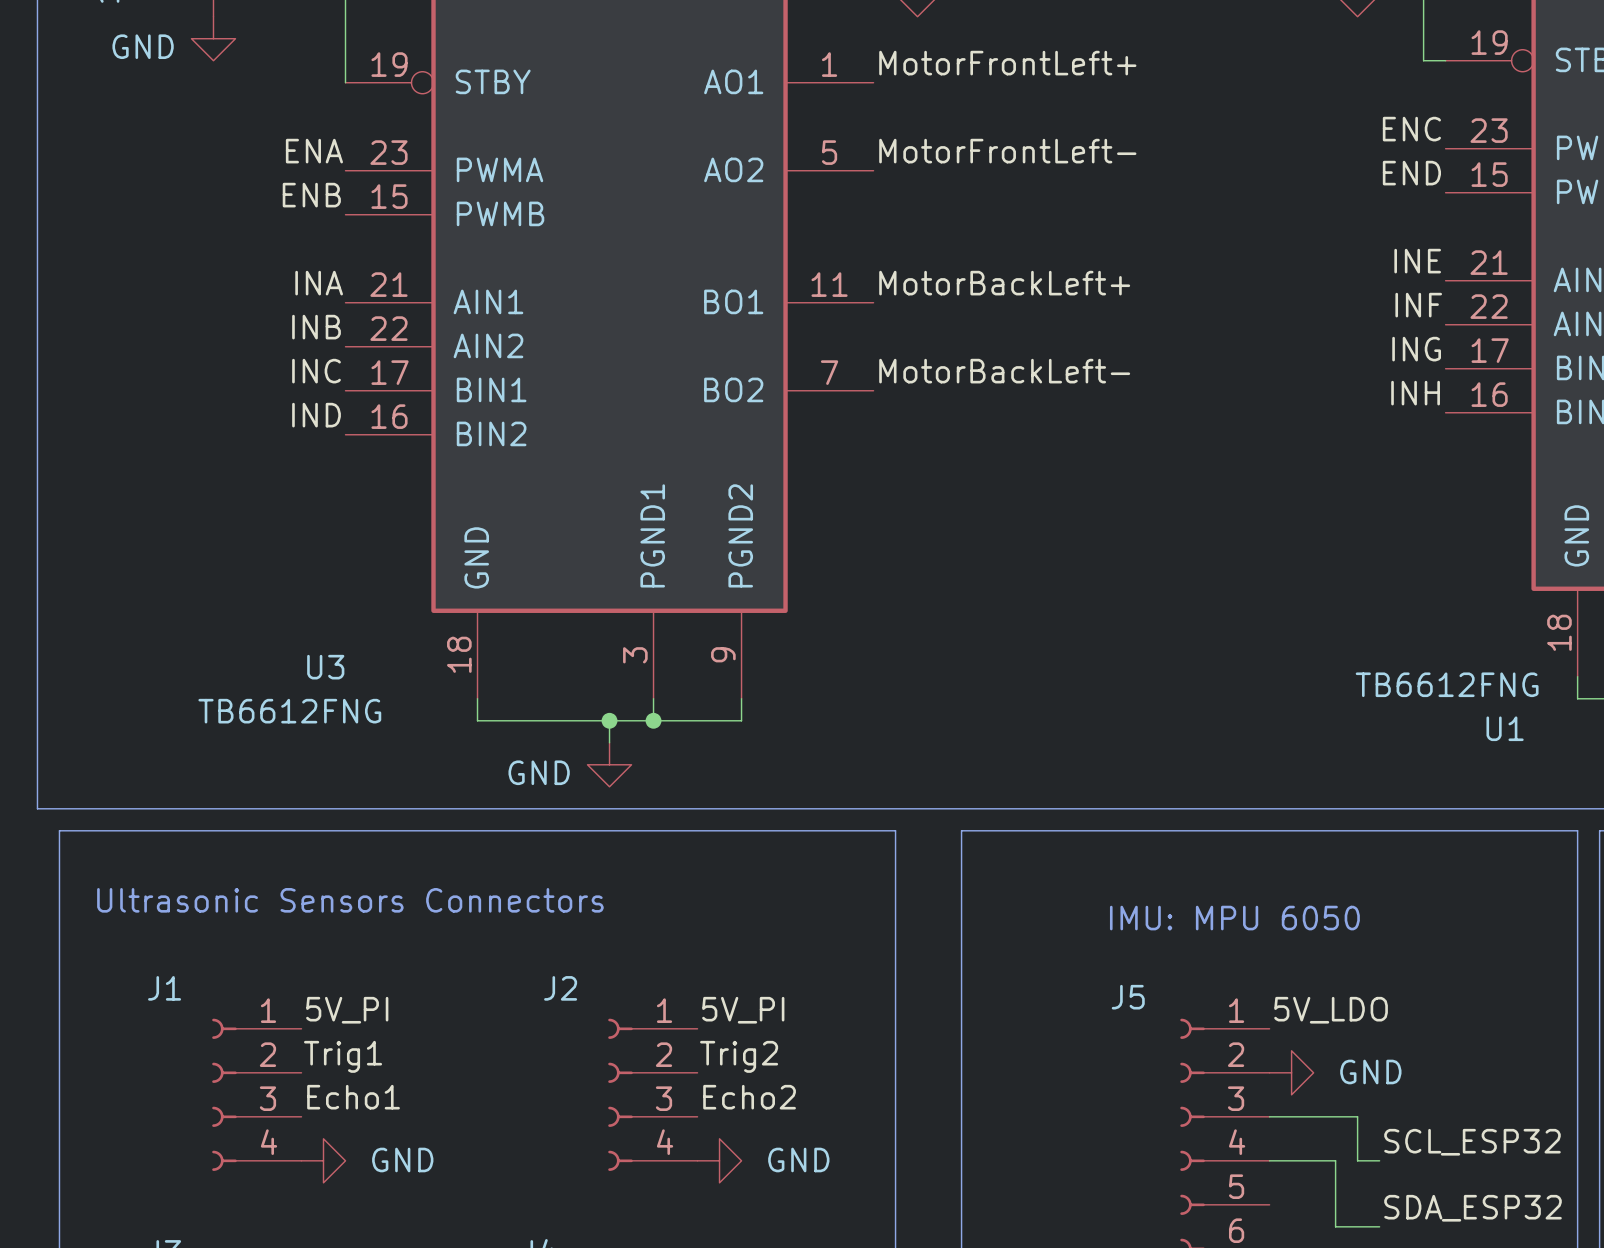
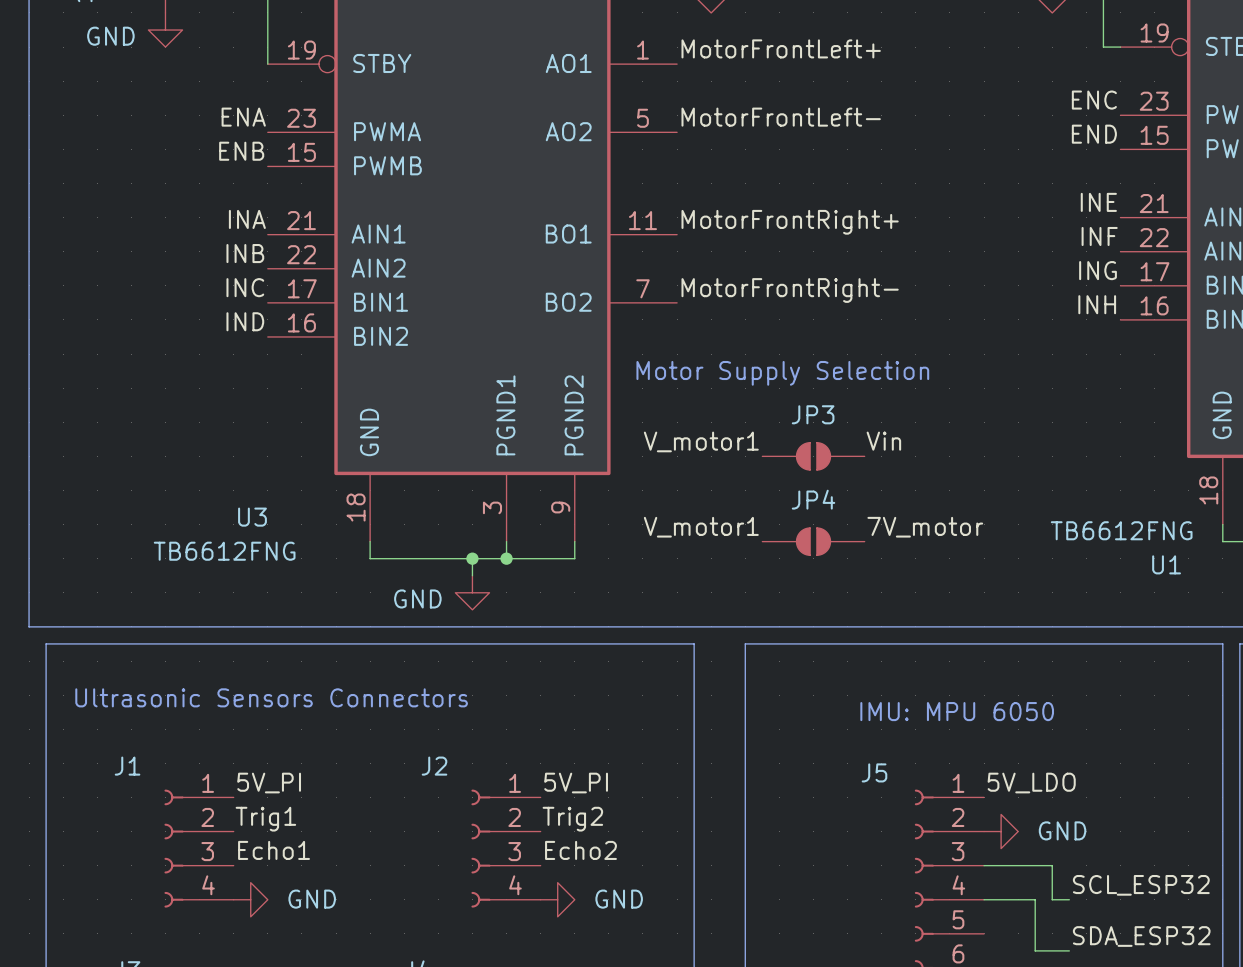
label: MotorBackLeft+ (1004, 283) -> MotorFrontRight+ (790, 222)
label: MotorBackLeft- (1004, 371) -> MotorFrontRight- (790, 290)
text: none -> Motor Supply Selection (782, 373)
label: none -> Vin (883, 441)
label: none -> V_motor1 (701, 441)
JP3: none -> (813, 456)
label: none -> V_motor1 (701, 527)
label: none -> 7V_motor (925, 527)
JP4: none -> (813, 541)

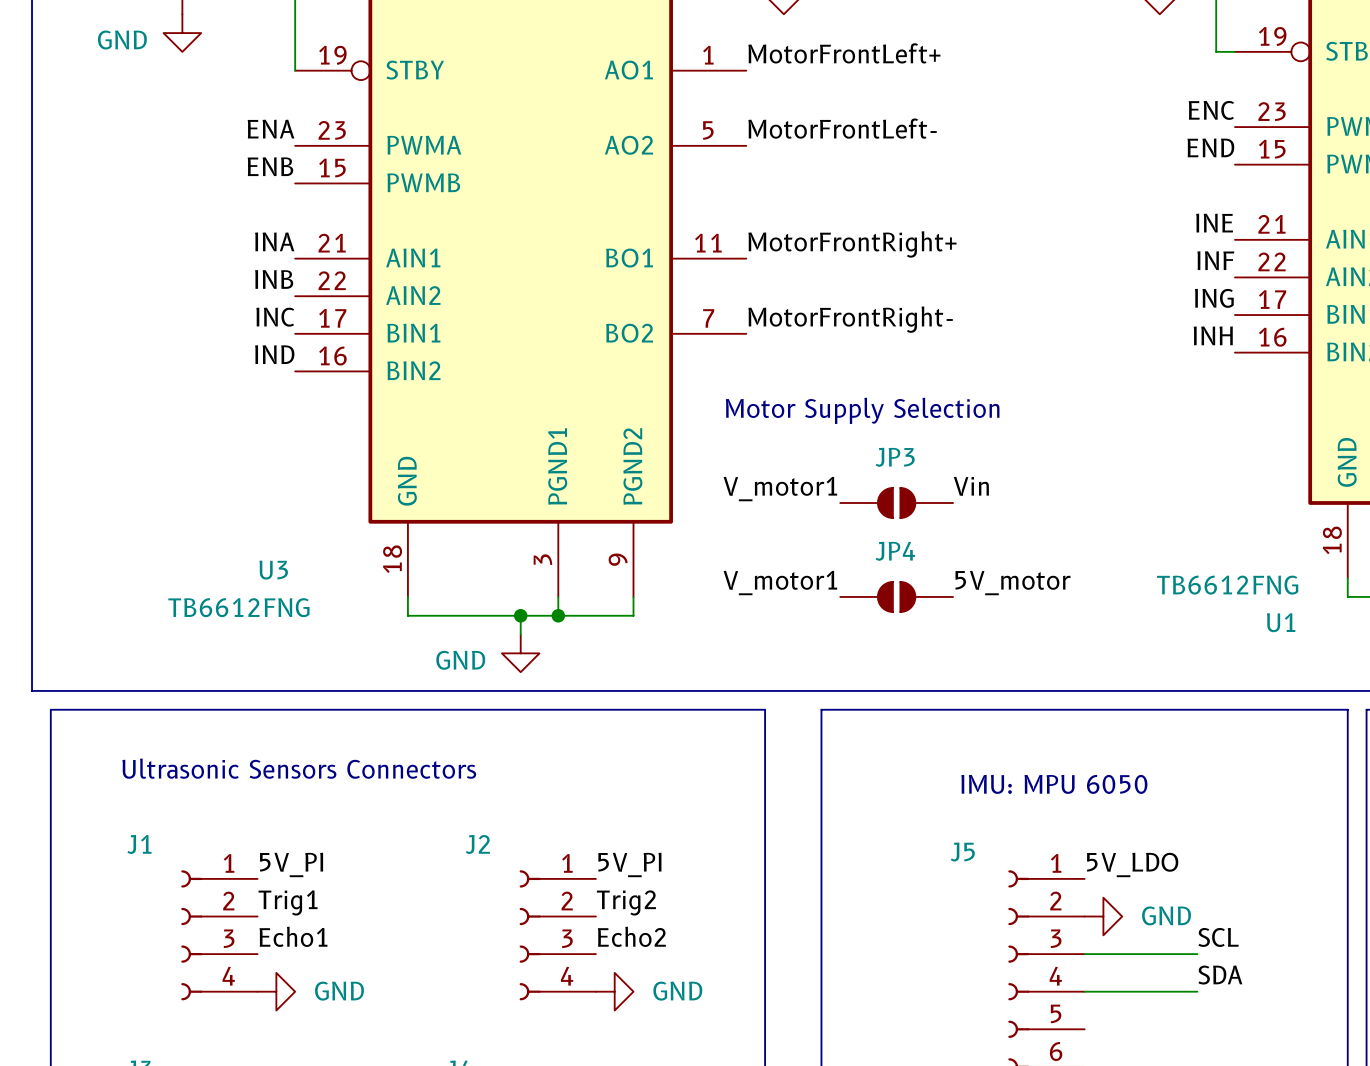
label: 7V_motor (925, 527) -> 5V_motor (1013, 583)
label: none -> SCL (1218, 937)
wire: (1052, 865) (1052, 899) -> (1141, 991) (1159, 991)
wire: none -> (1159, 954) (1197, 954)
label: none -> SDA (1220, 975)
label: SCL_ESP32 (1141, 885) -> none
wire: (1035, 899) (1035, 950) (1069, 950) -> none
wire: none -> (1178, 991) (1197, 991)
label: SDA_ESP32 (1141, 936) -> none

